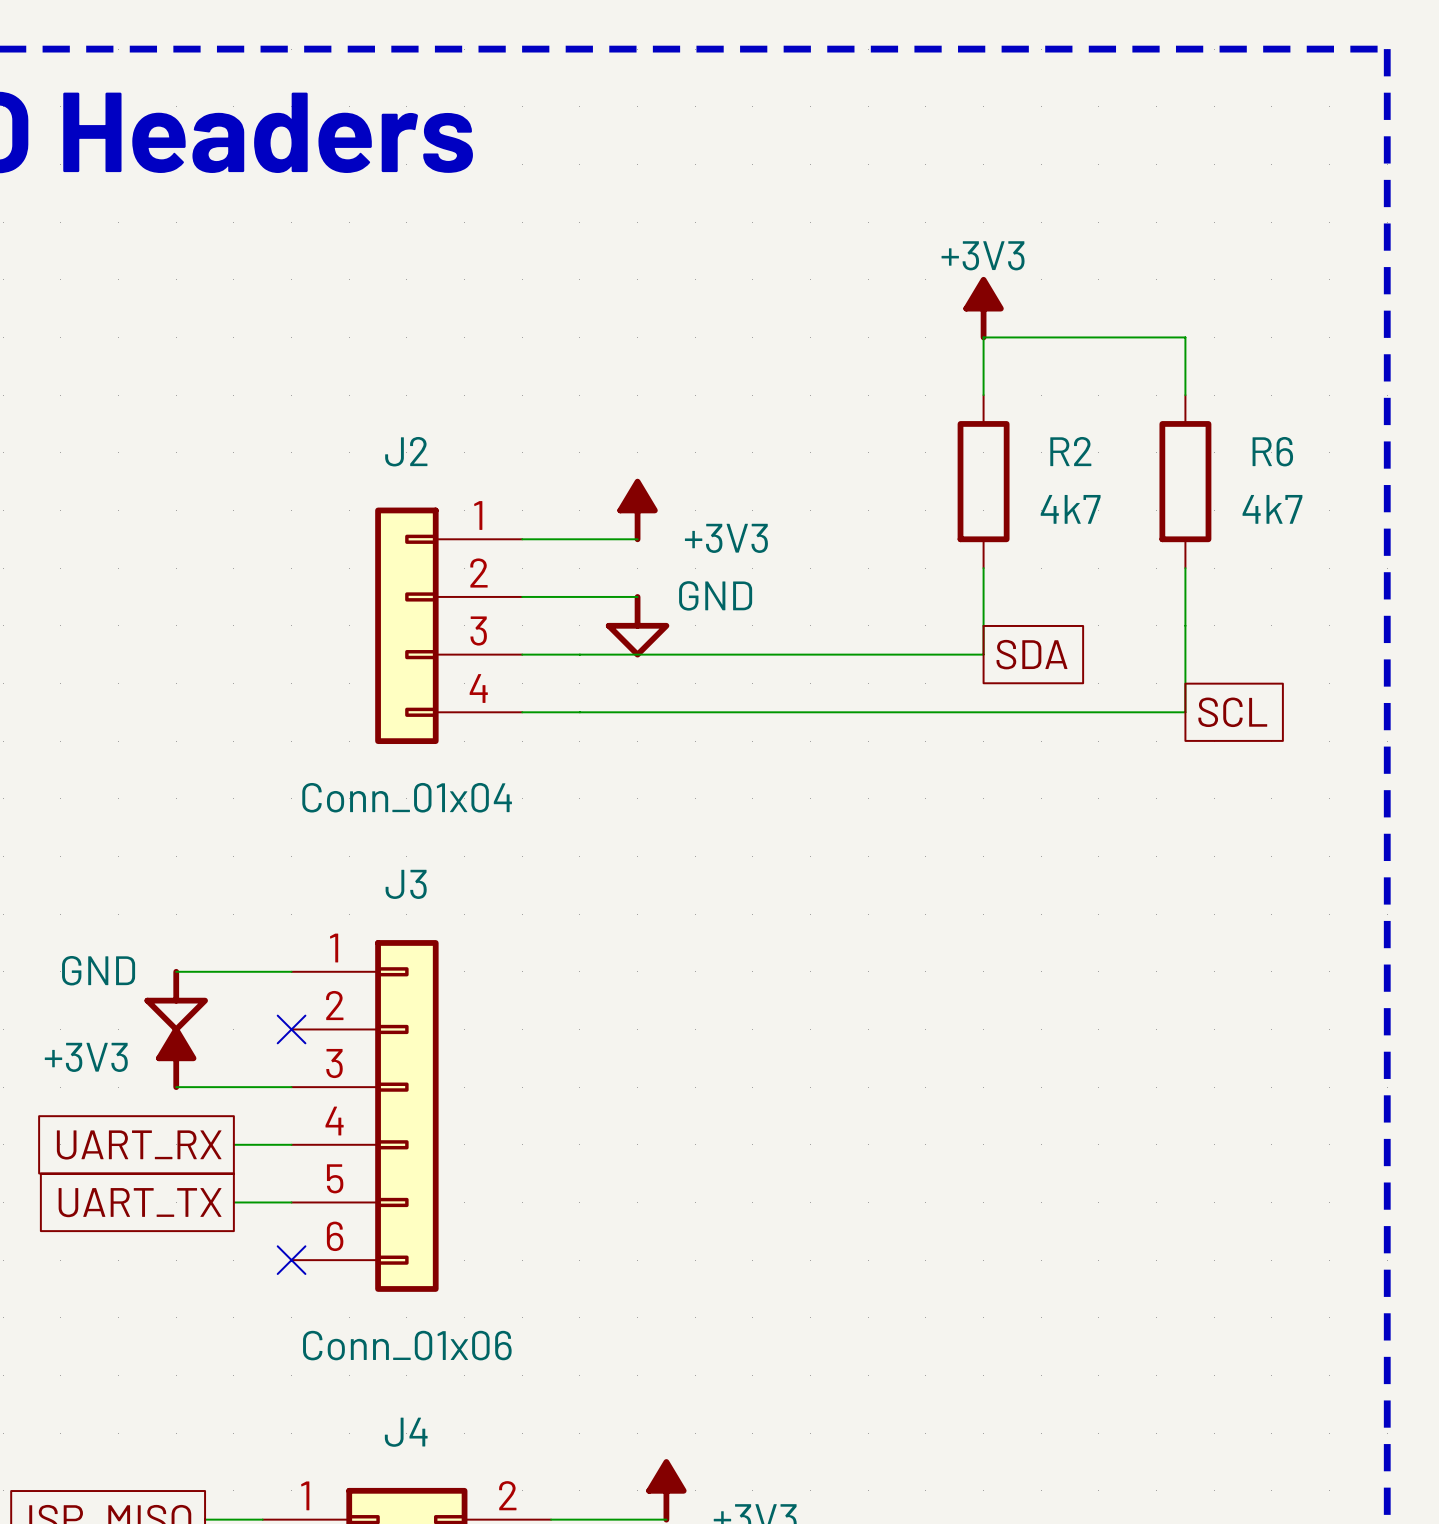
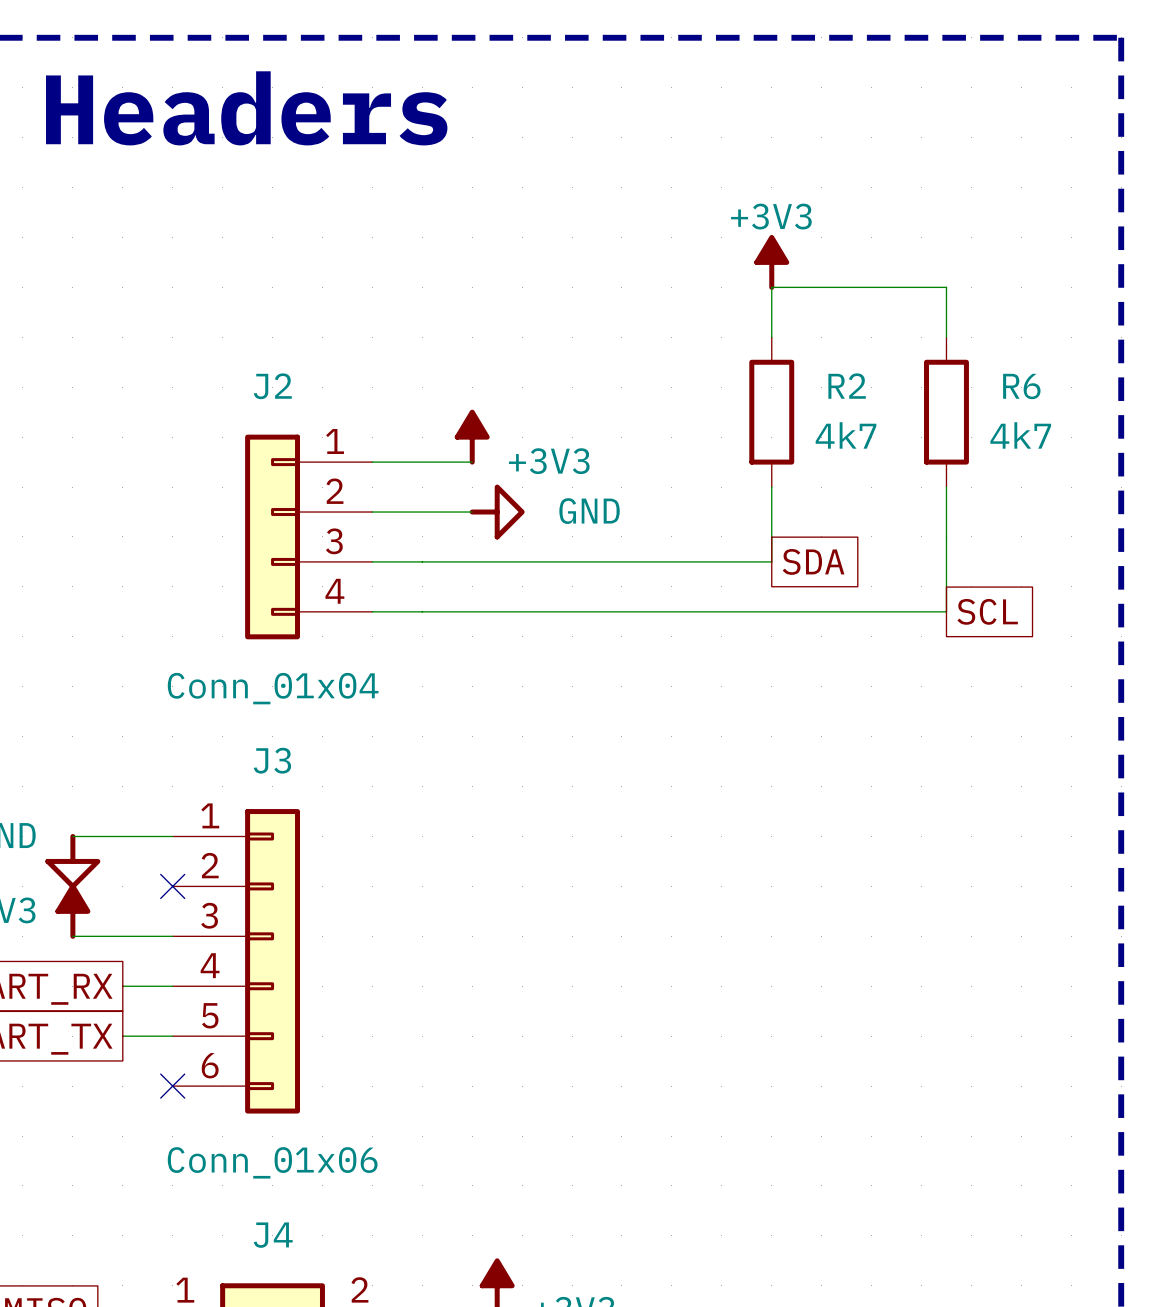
power symbol rotation: 0° (637, 625) -> 90° counterclockwise (497, 512)
power symbol position: GND (637, 625) -> GND (497, 512)

